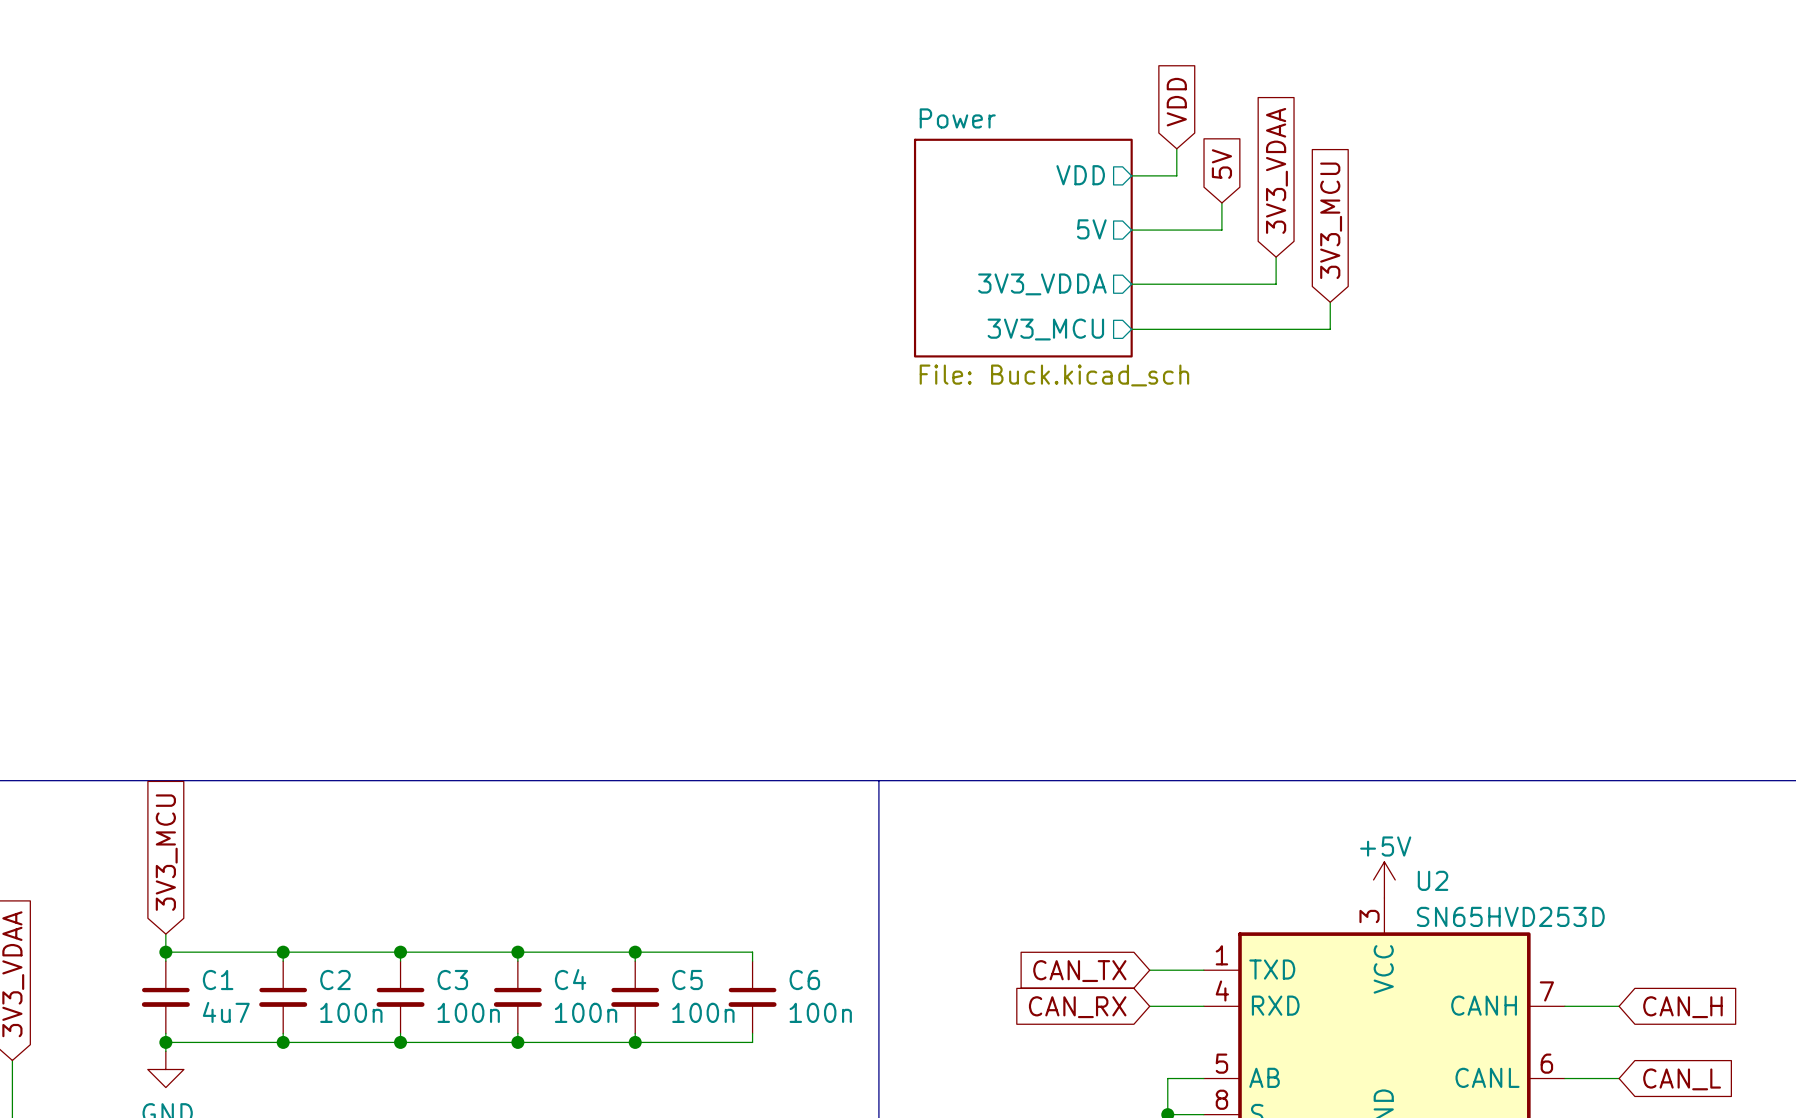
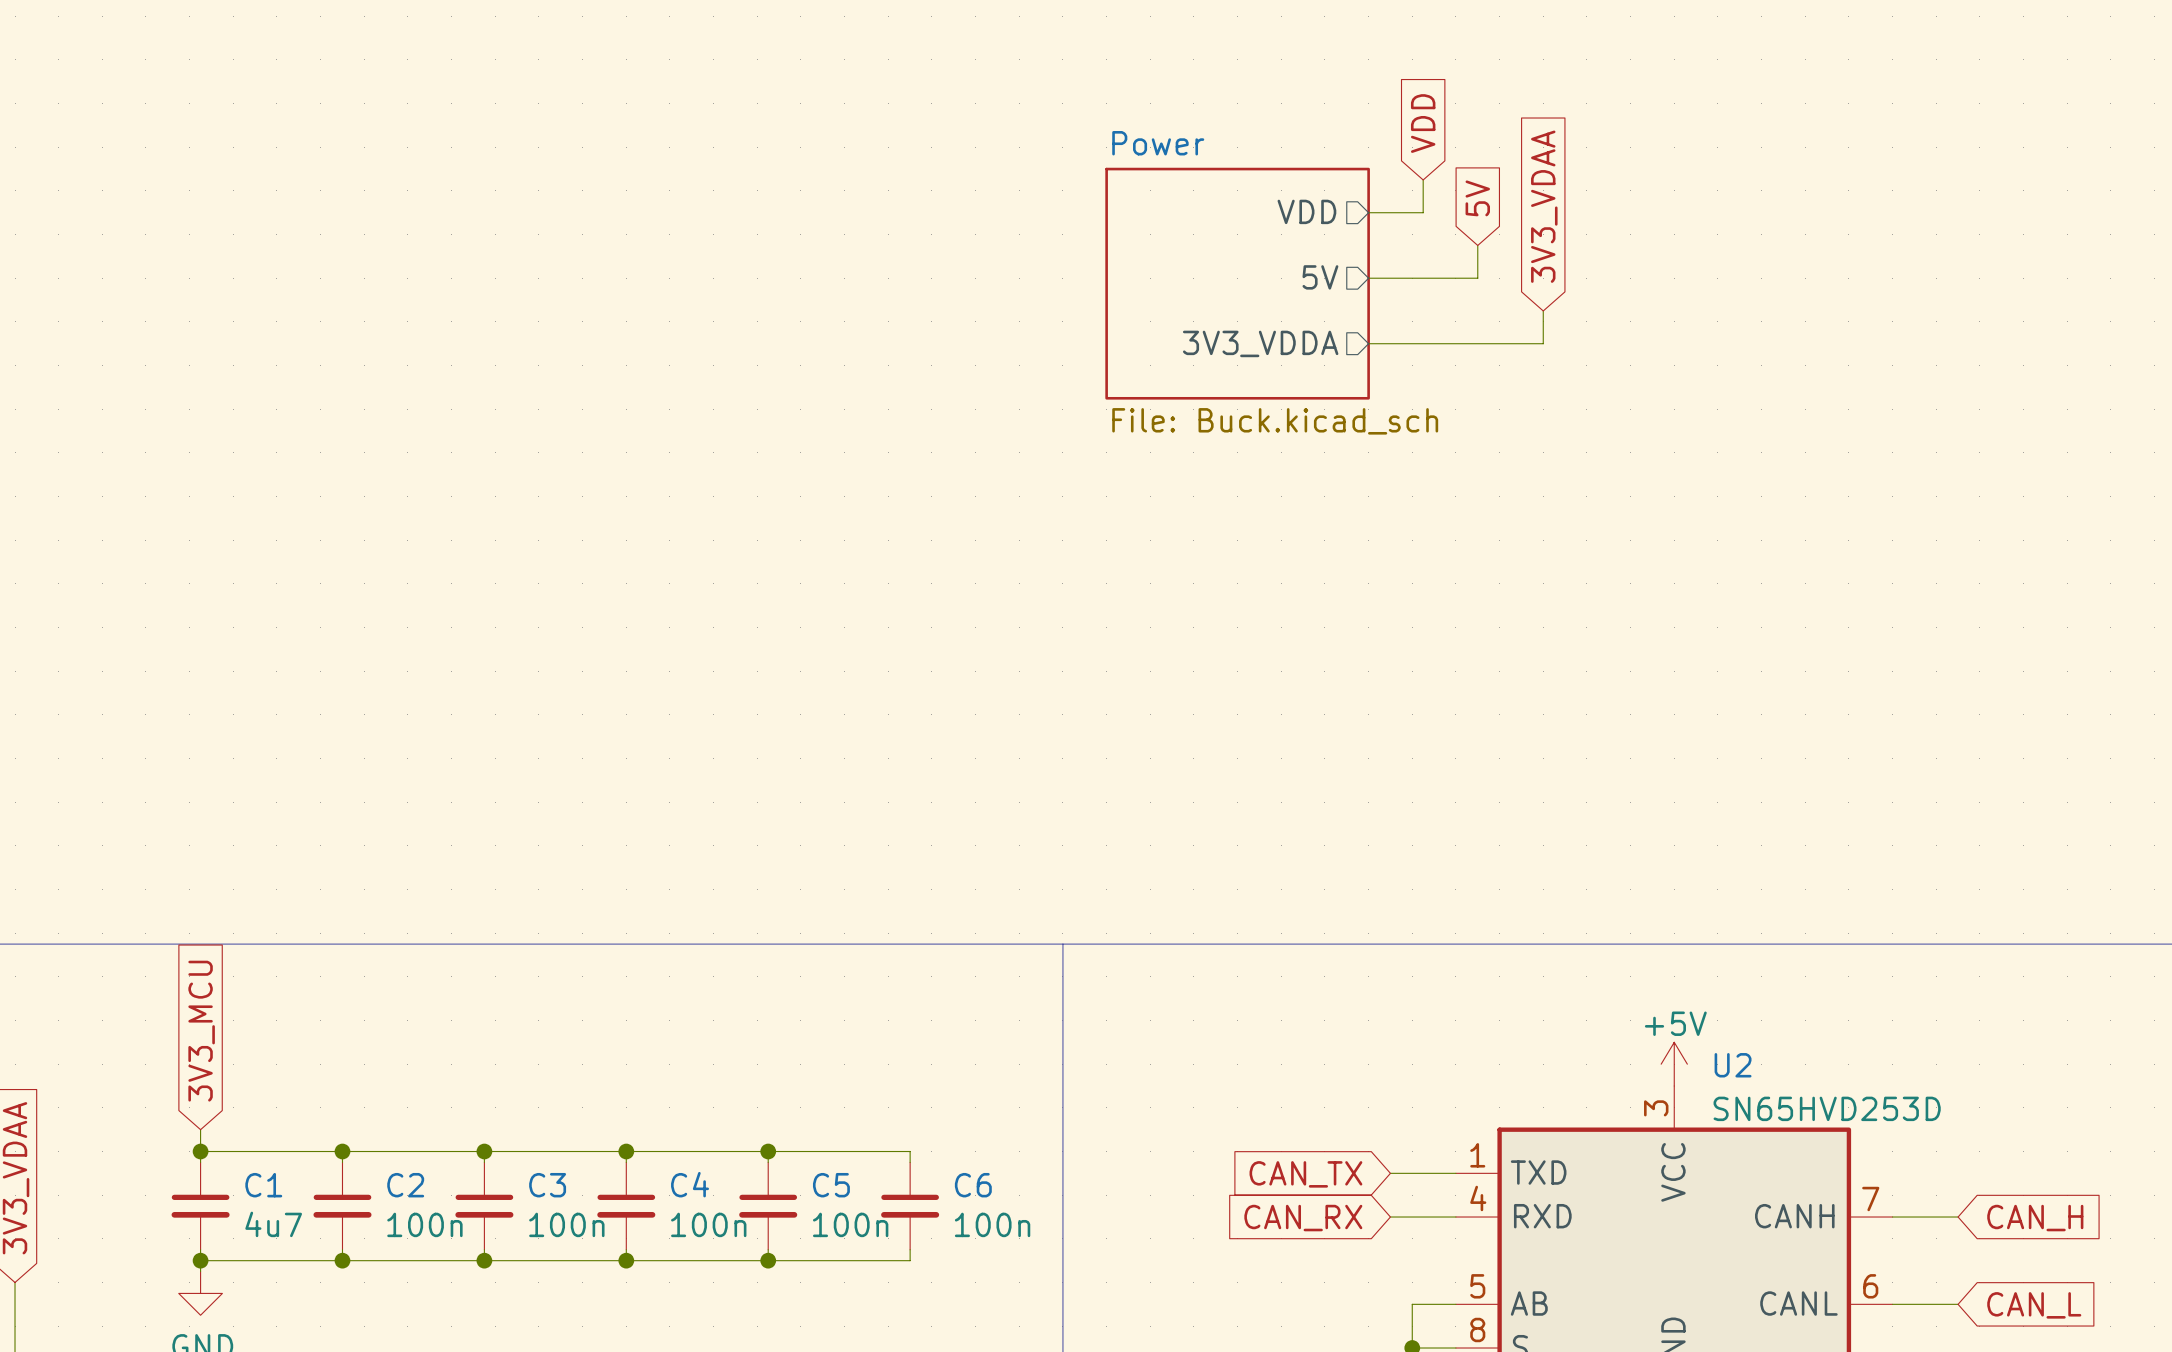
sheet Power shape: [913, 138, 1133, 358] -> [1105, 167, 1370, 400]
global label: 3V3_MCU (1331, 220) -> none
wire: (1330, 302) (1330, 329) (1131, 329) -> none
sheet pin: 3V3_MCU (1045, 329) -> none

